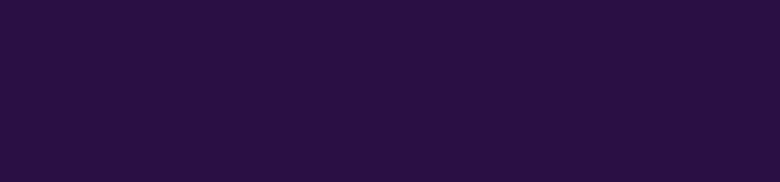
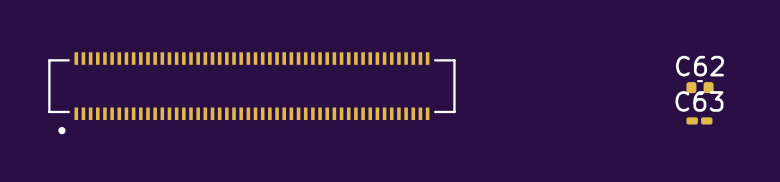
C62: none -> (700, 87)
part: none -> (251, 93)
C63: none -> (699, 120)

